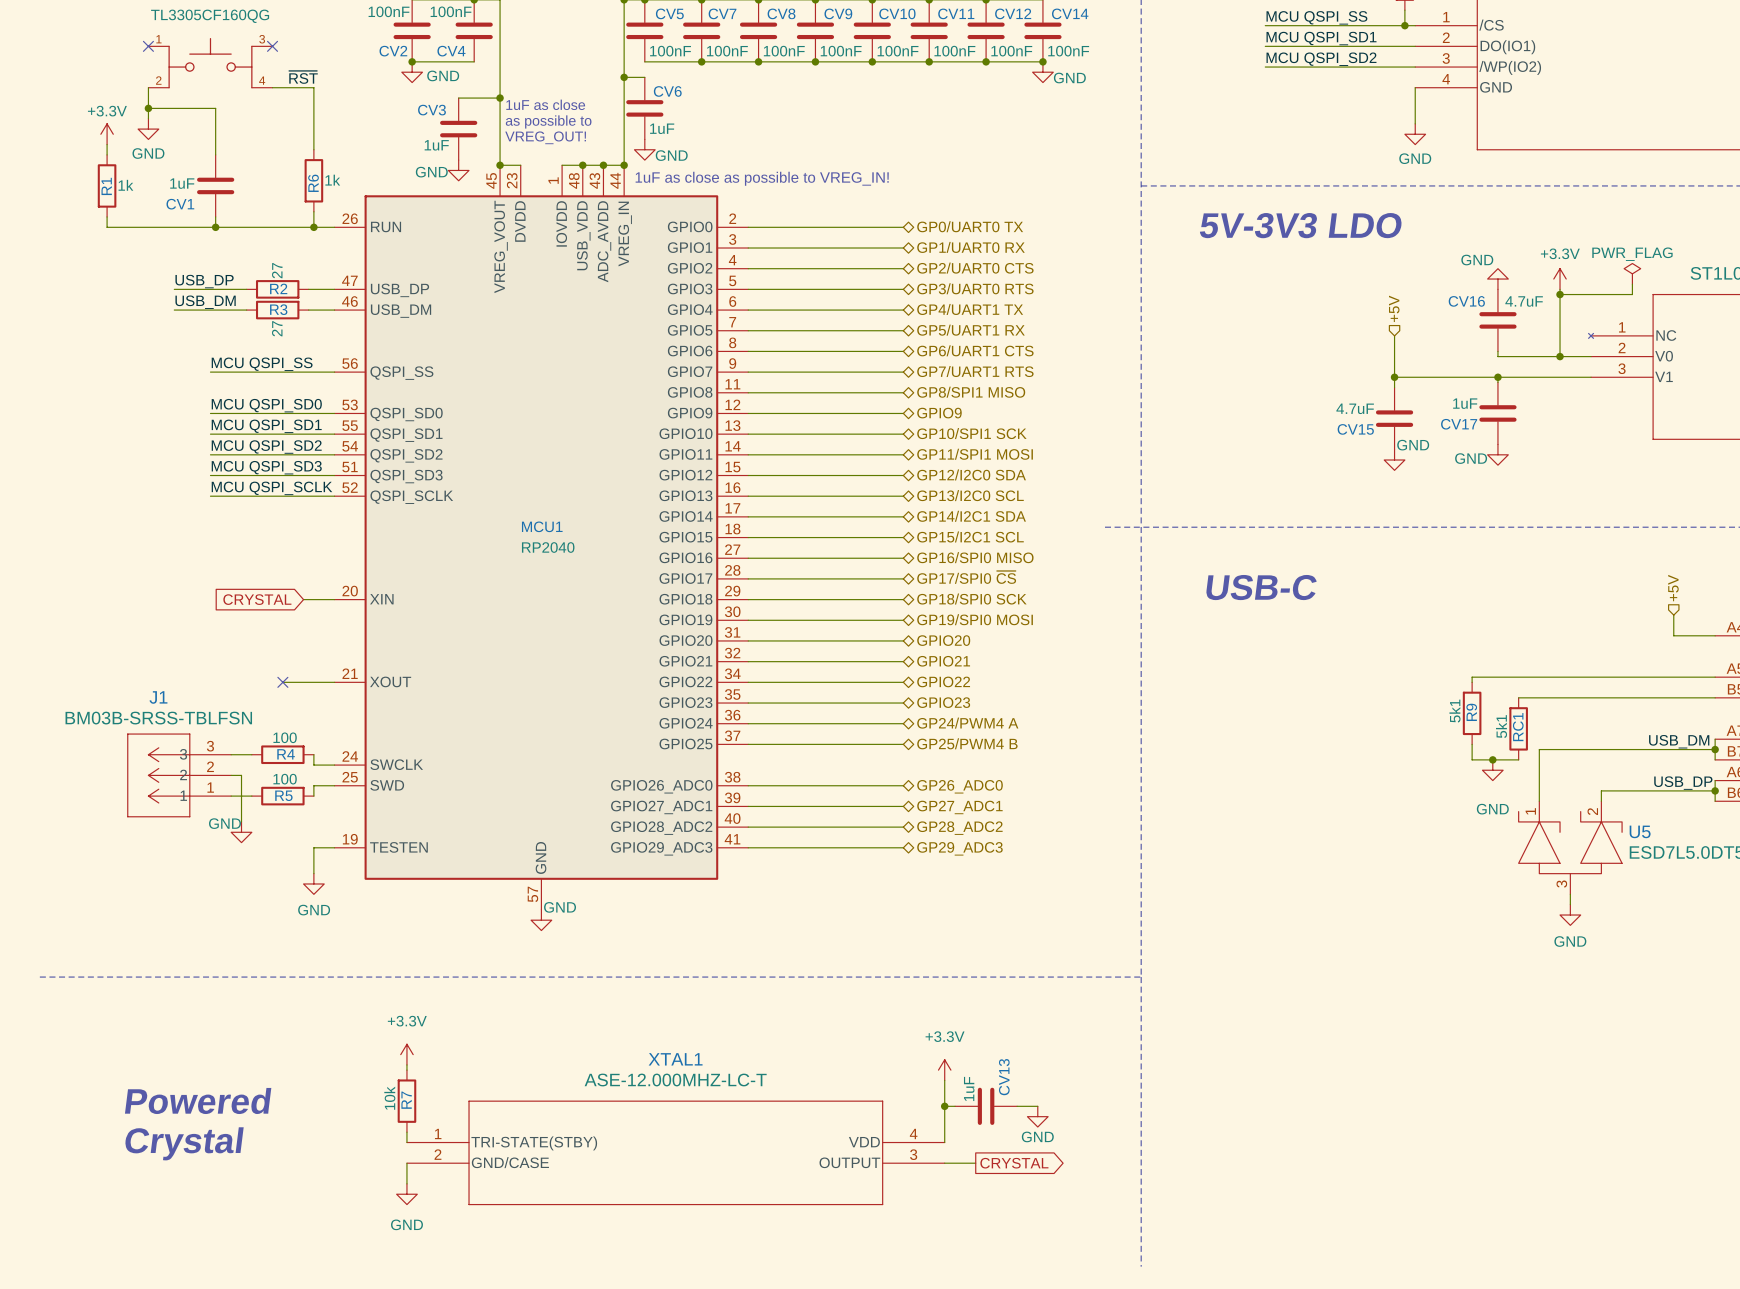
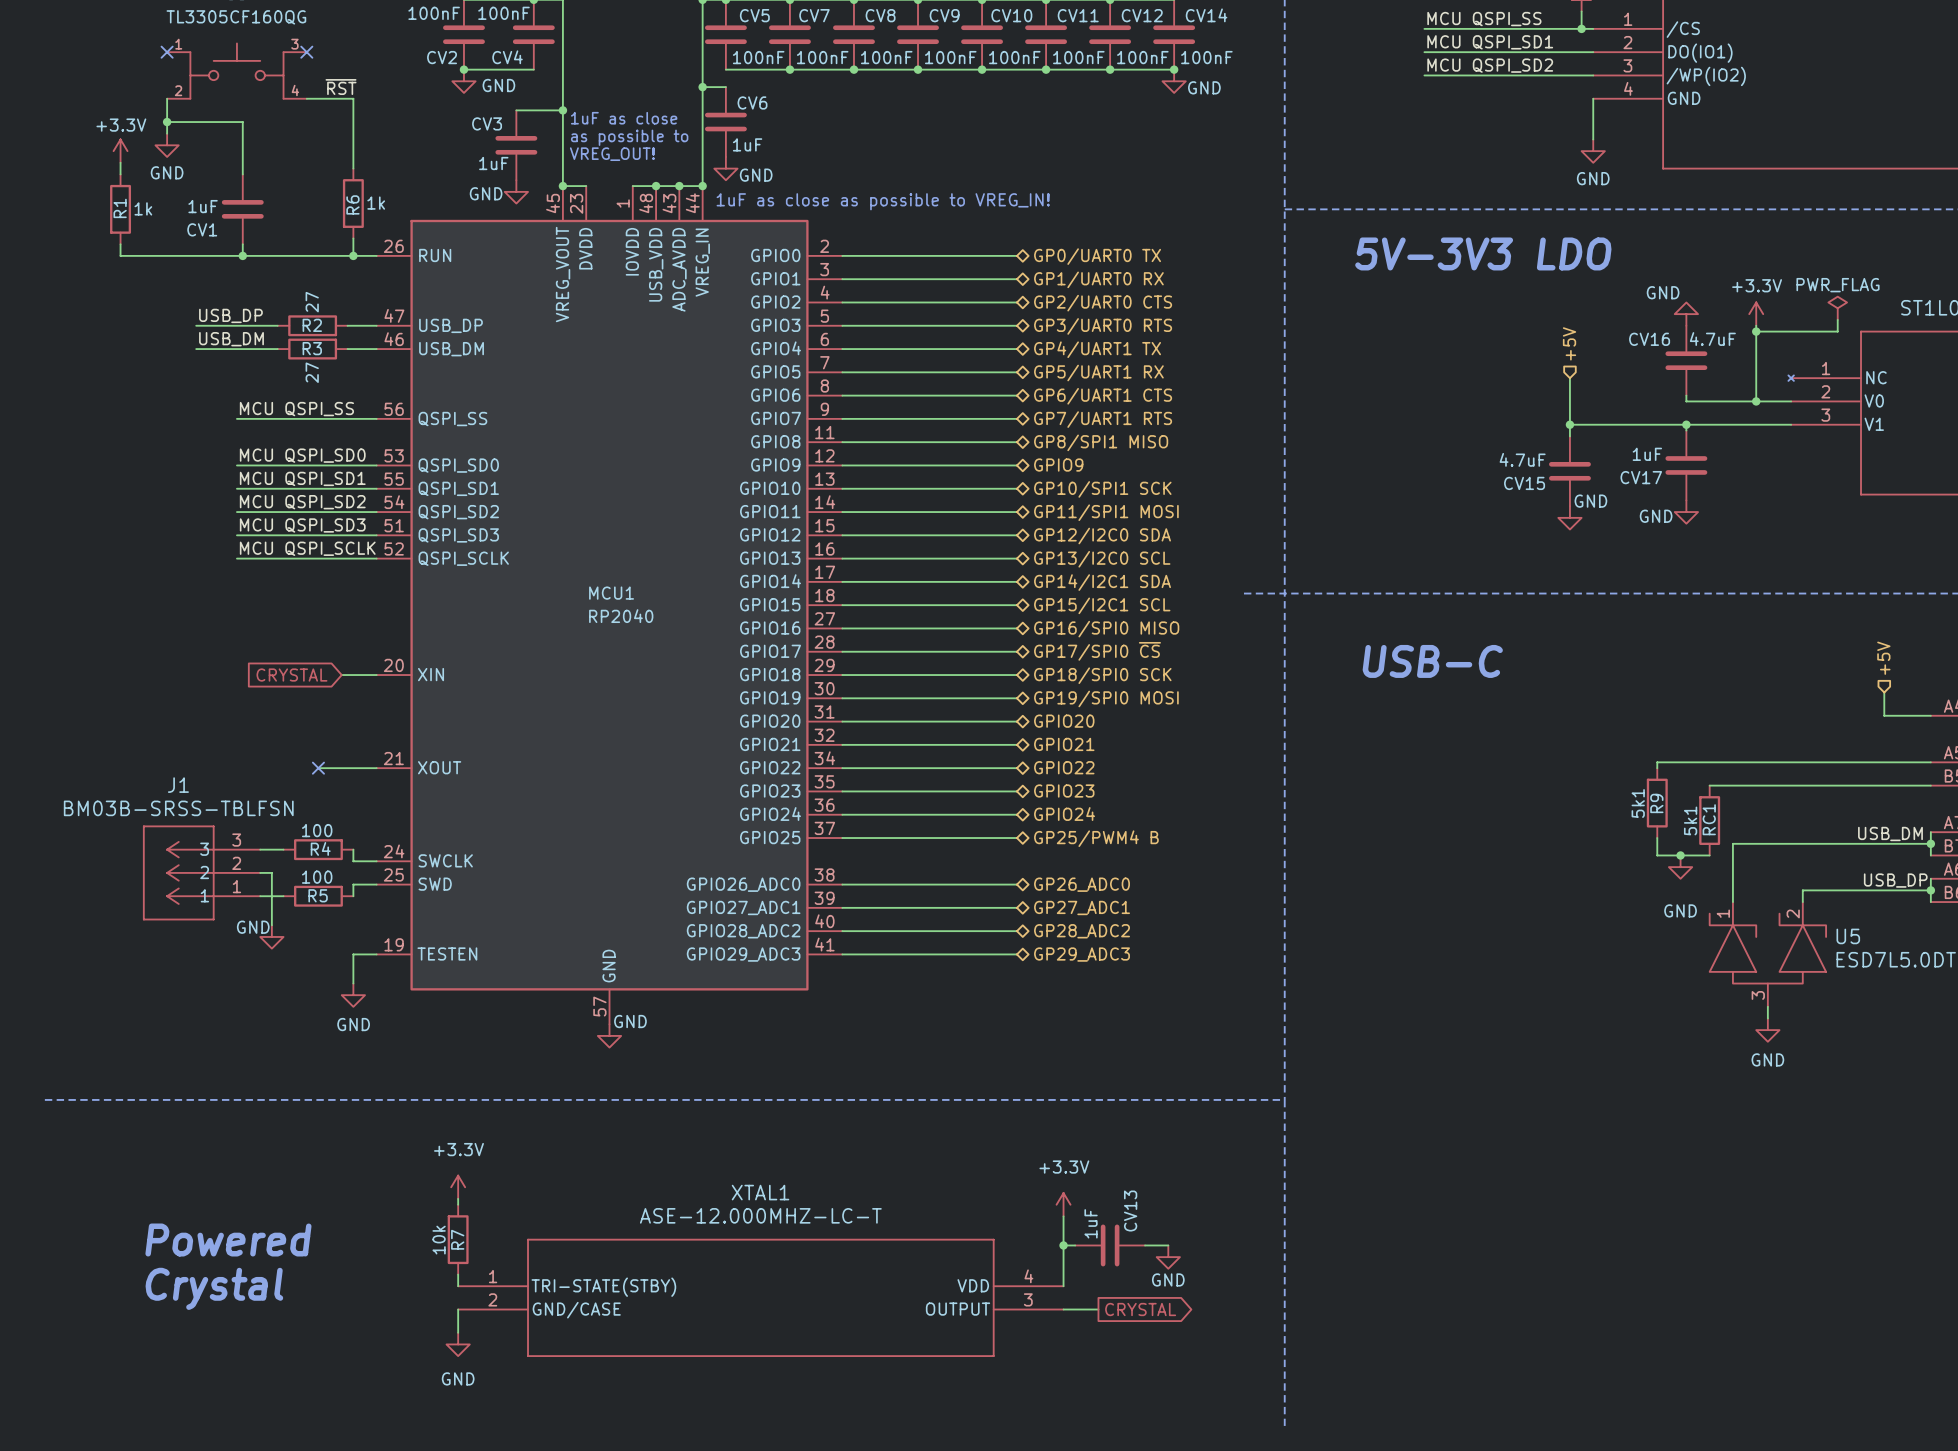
hierarchical label: GP24/PWM4 A (967, 723) -> GPIO24 (1064, 814)

